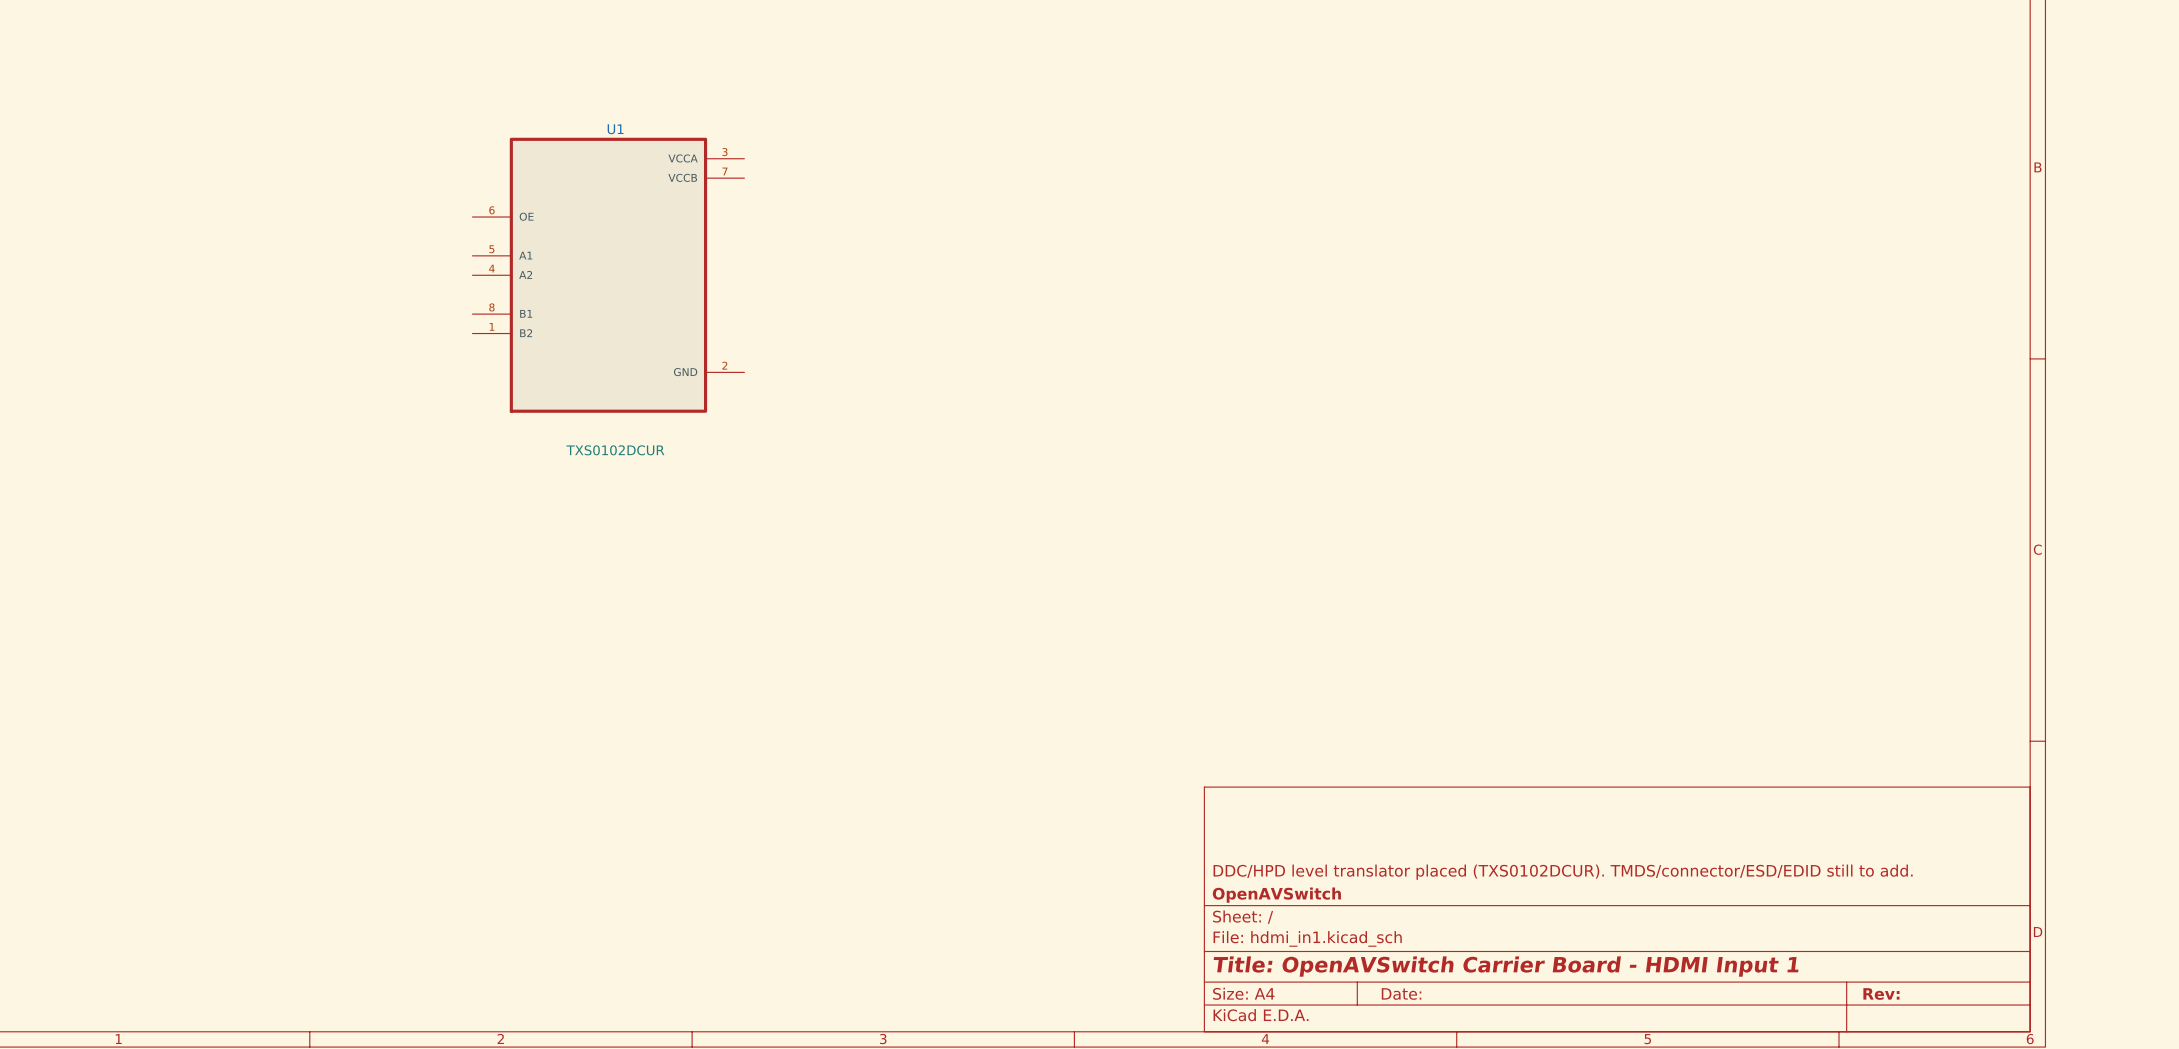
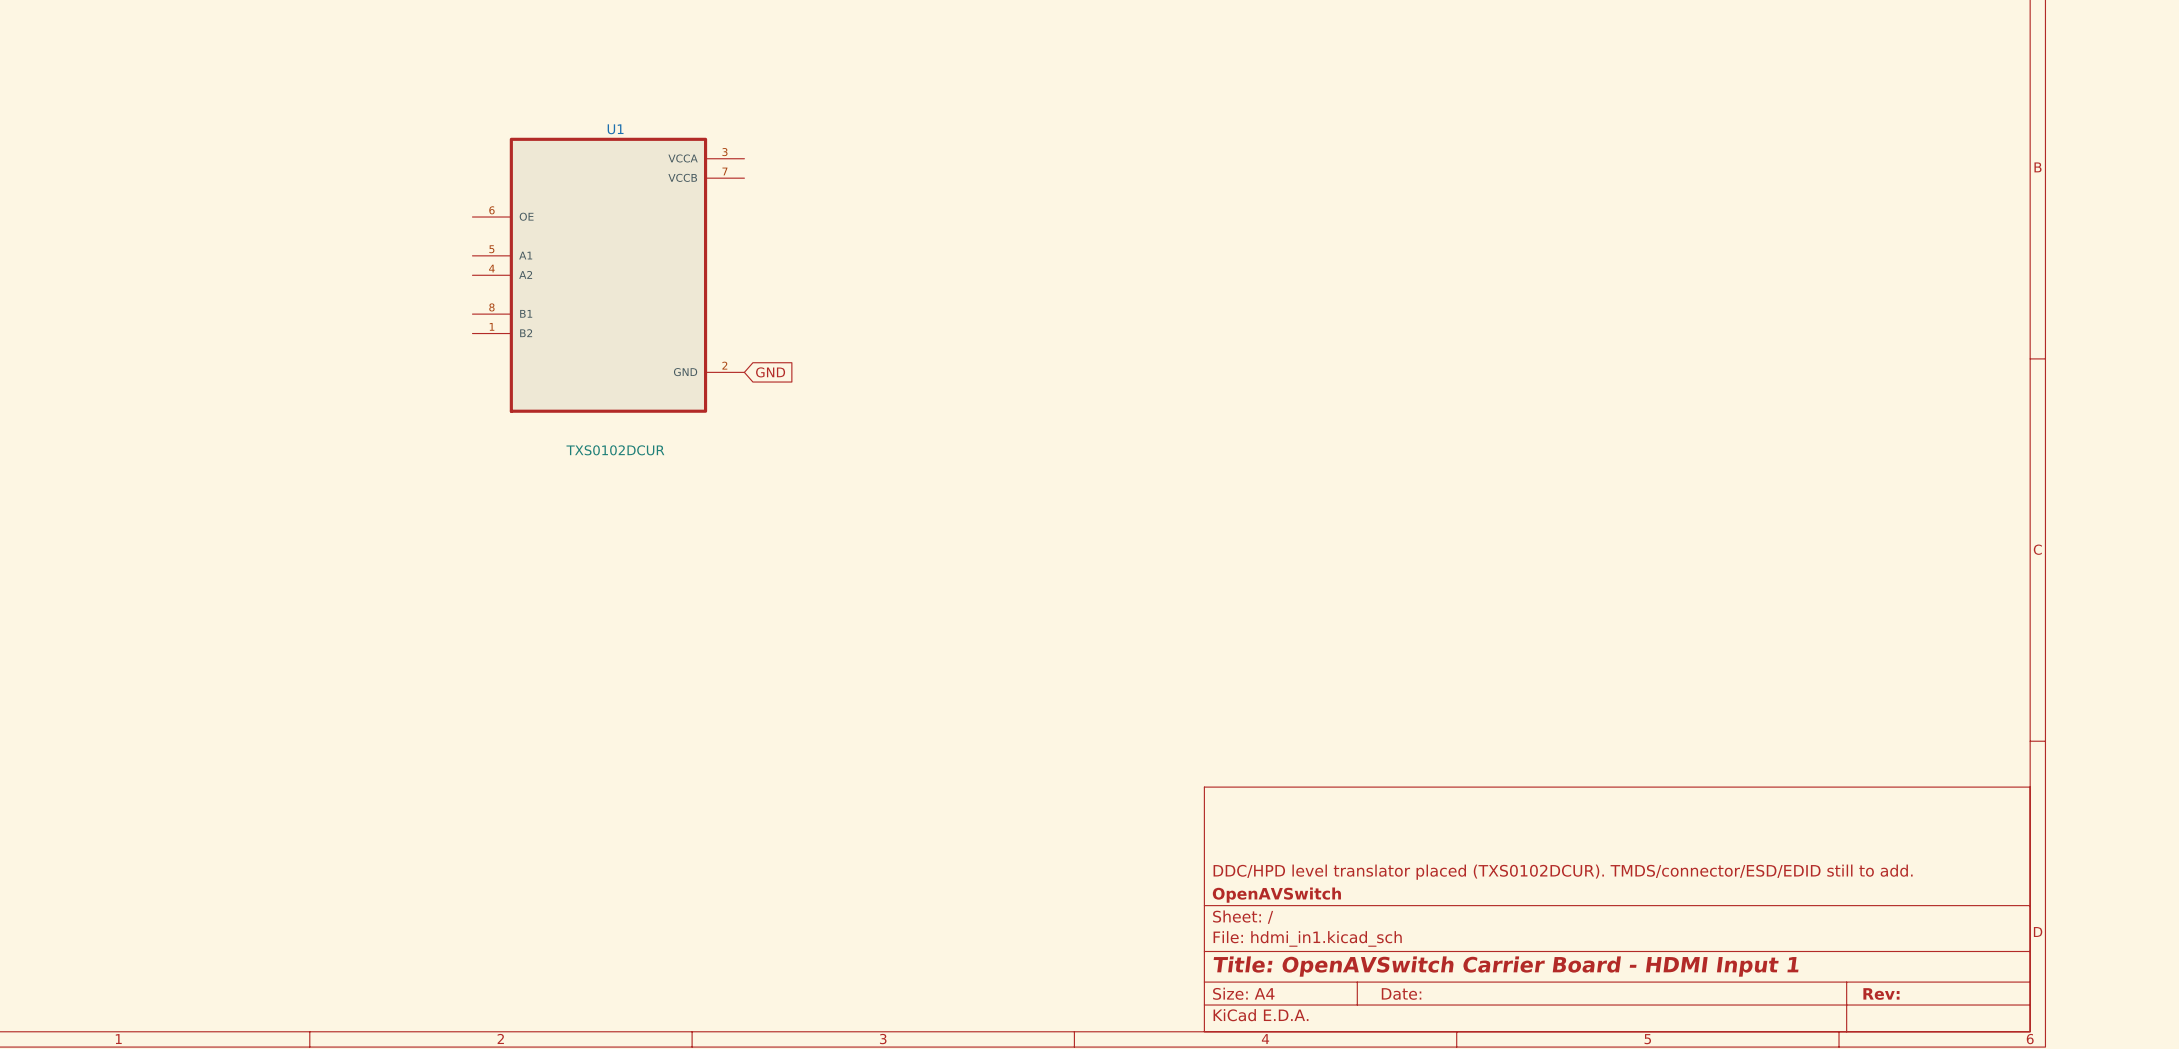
global label: none -> GND (770, 372)

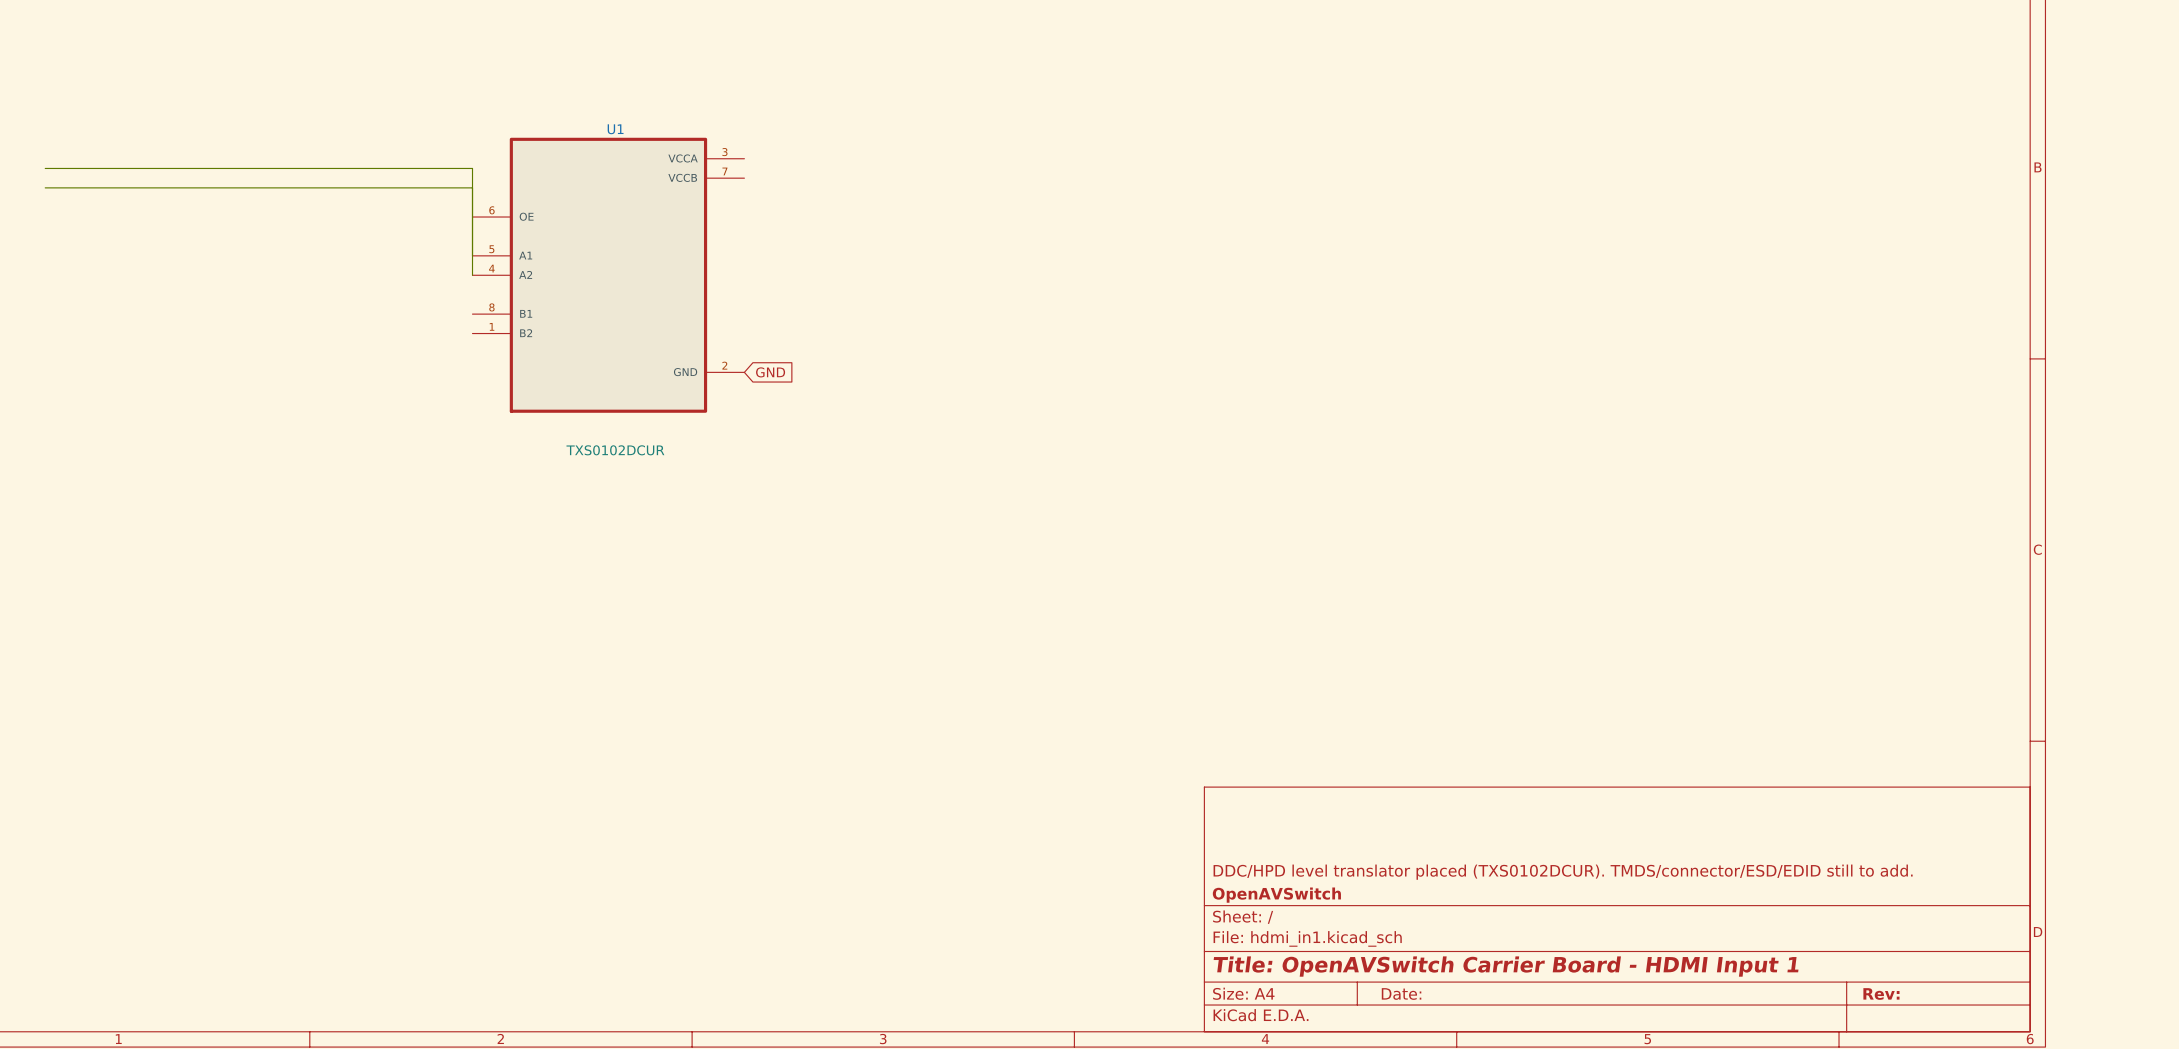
wire: none -> (45, 168) (472, 168) (472, 275)
wire: none -> (45, 187) (472, 187)

